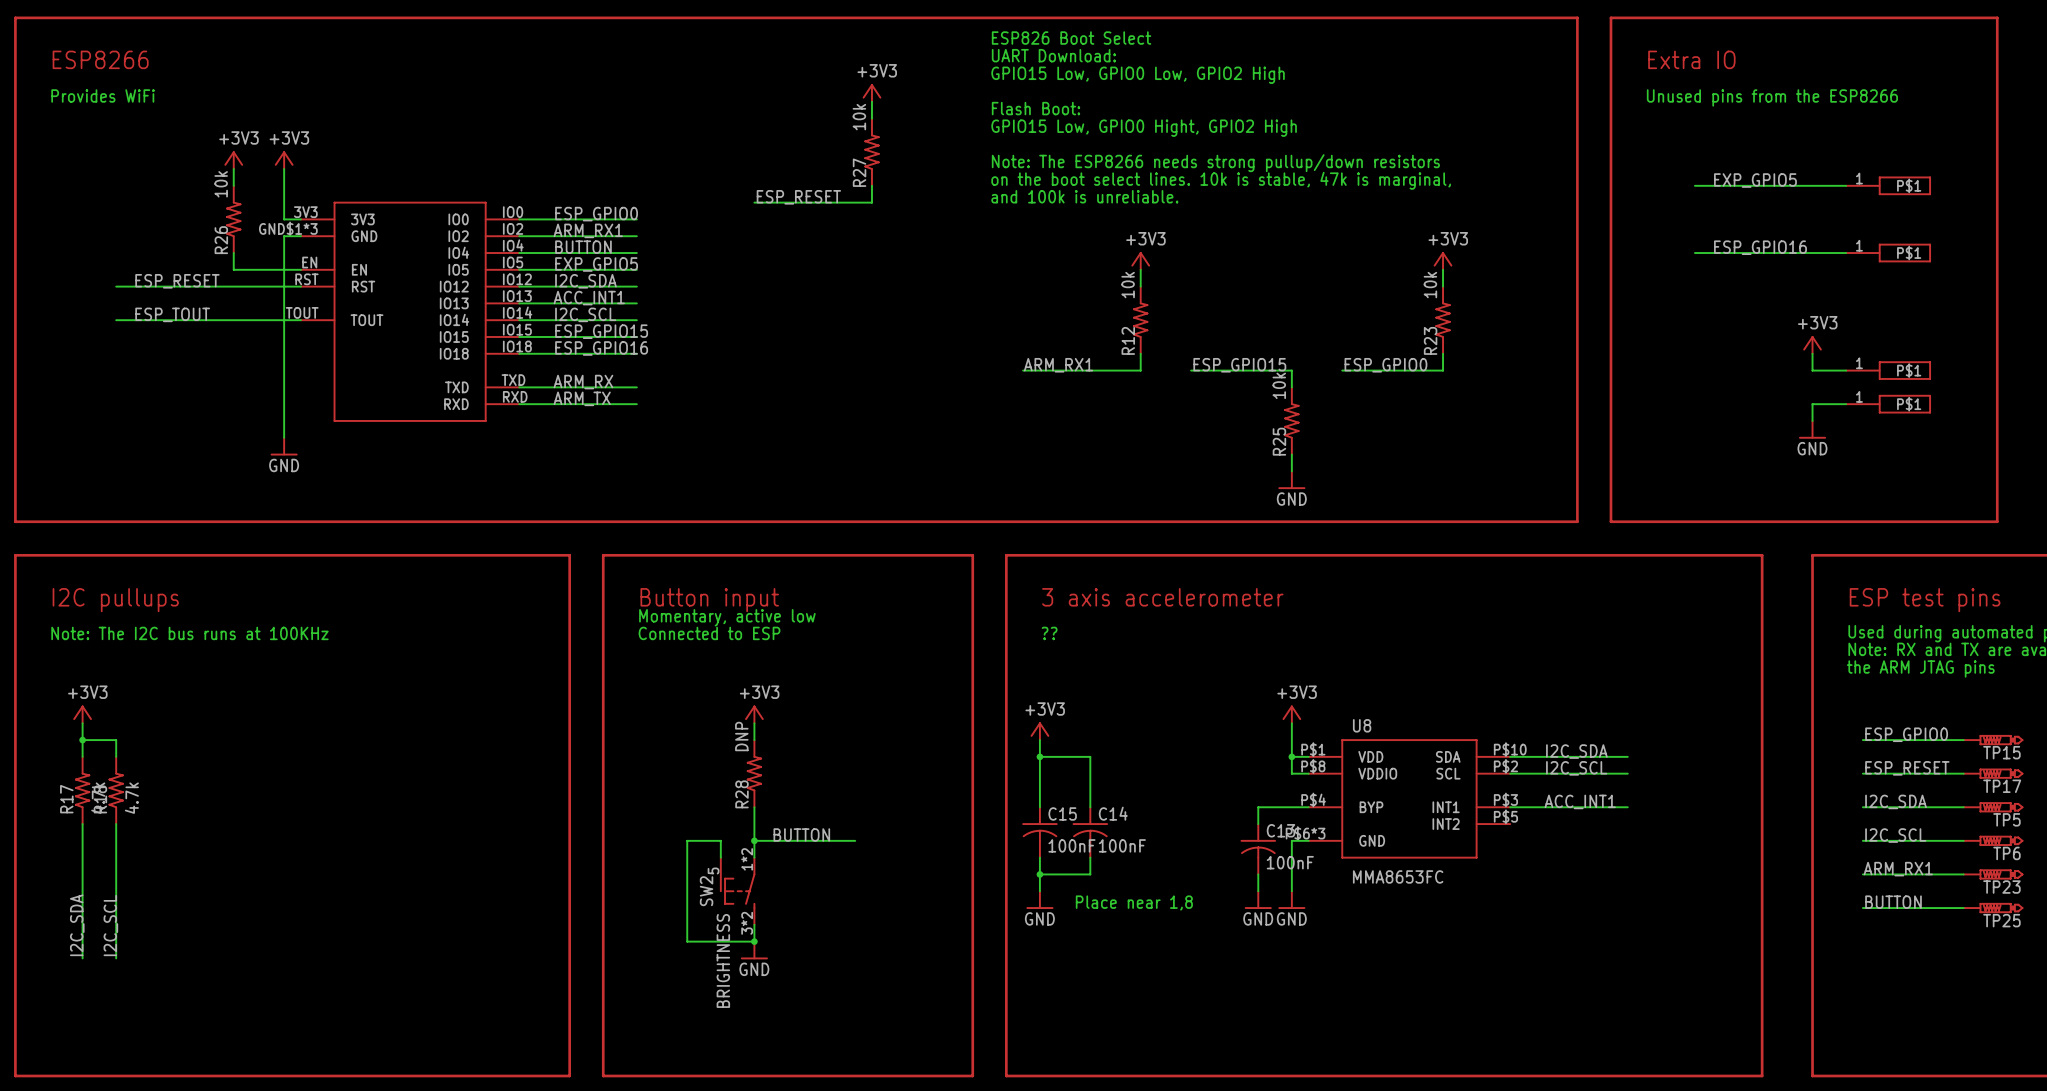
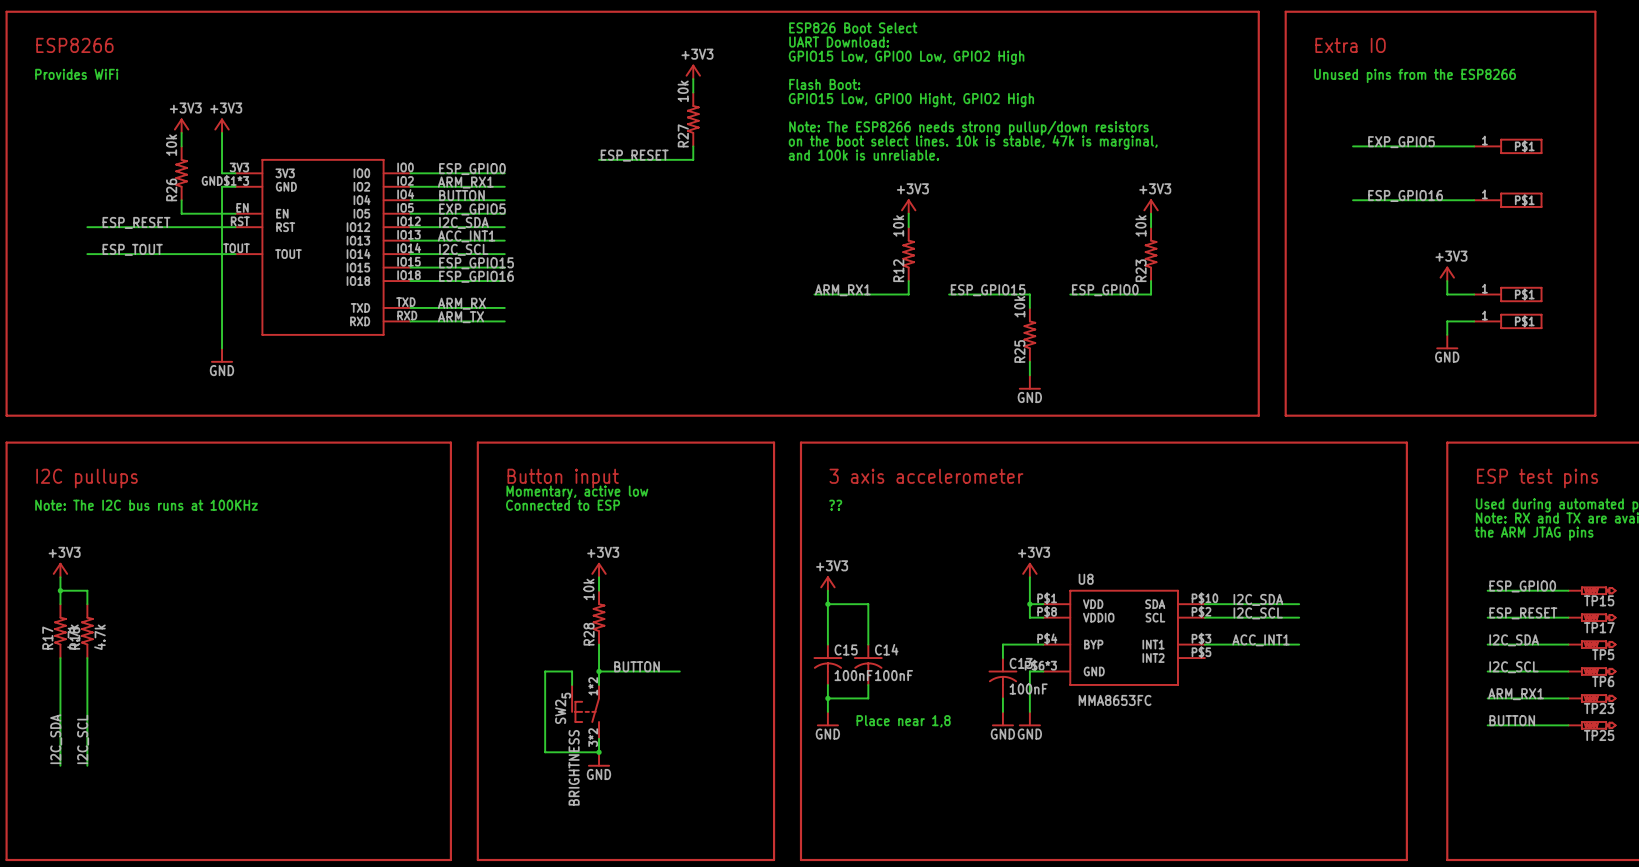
R28 value: DNP (741, 736) -> 10k (588, 589)

